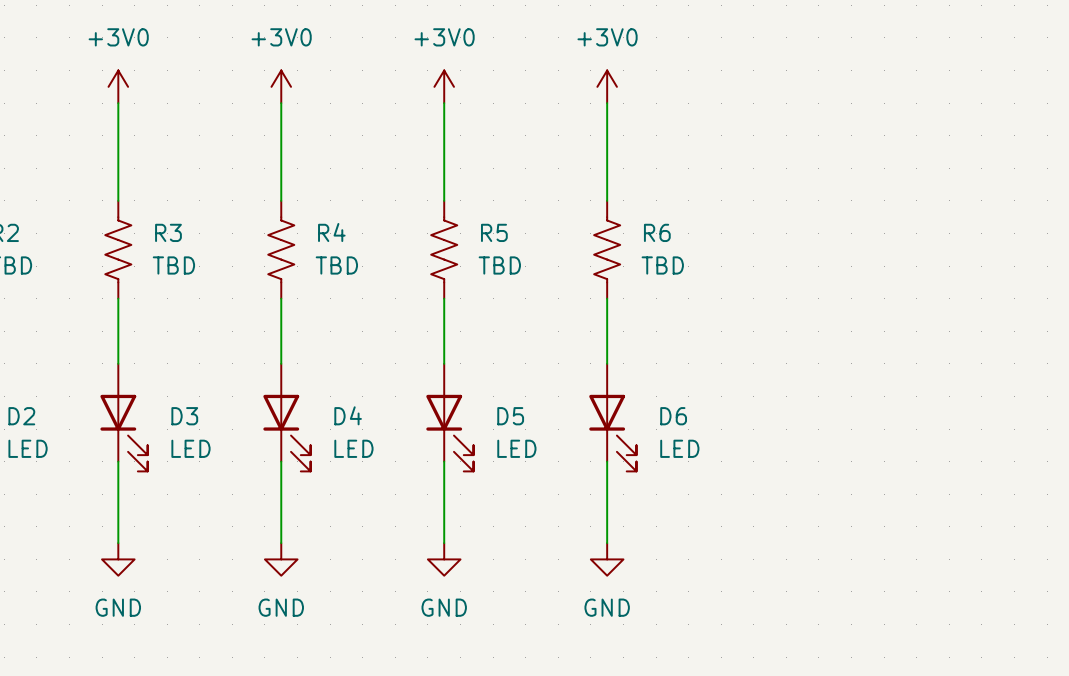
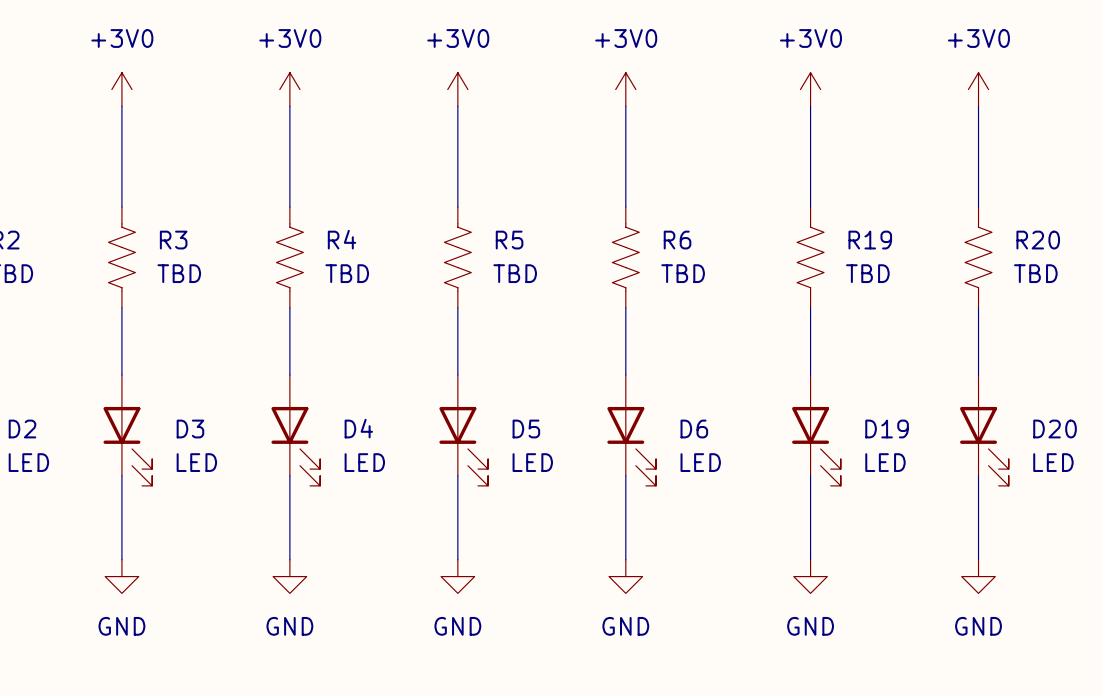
power symbol: none -> +3V0 (810, 89)
power symbol: none -> +3V0 (978, 89)
wire: none -> (810, 106) (810, 207)
wire: none -> (978, 106) (978, 207)
R19: none -> TBD (810, 257)
R20: none -> TBD (978, 257)
wire: none -> (810, 307) (810, 375)
wire: none -> (978, 307) (978, 375)
D19: none -> LED (816, 430)
D20: none -> LED (984, 430)
wire: none -> (810, 475) (810, 559)
wire: none -> (978, 475) (978, 559)
power symbol: none -> GND (810, 576)
power symbol: none -> GND (978, 576)

